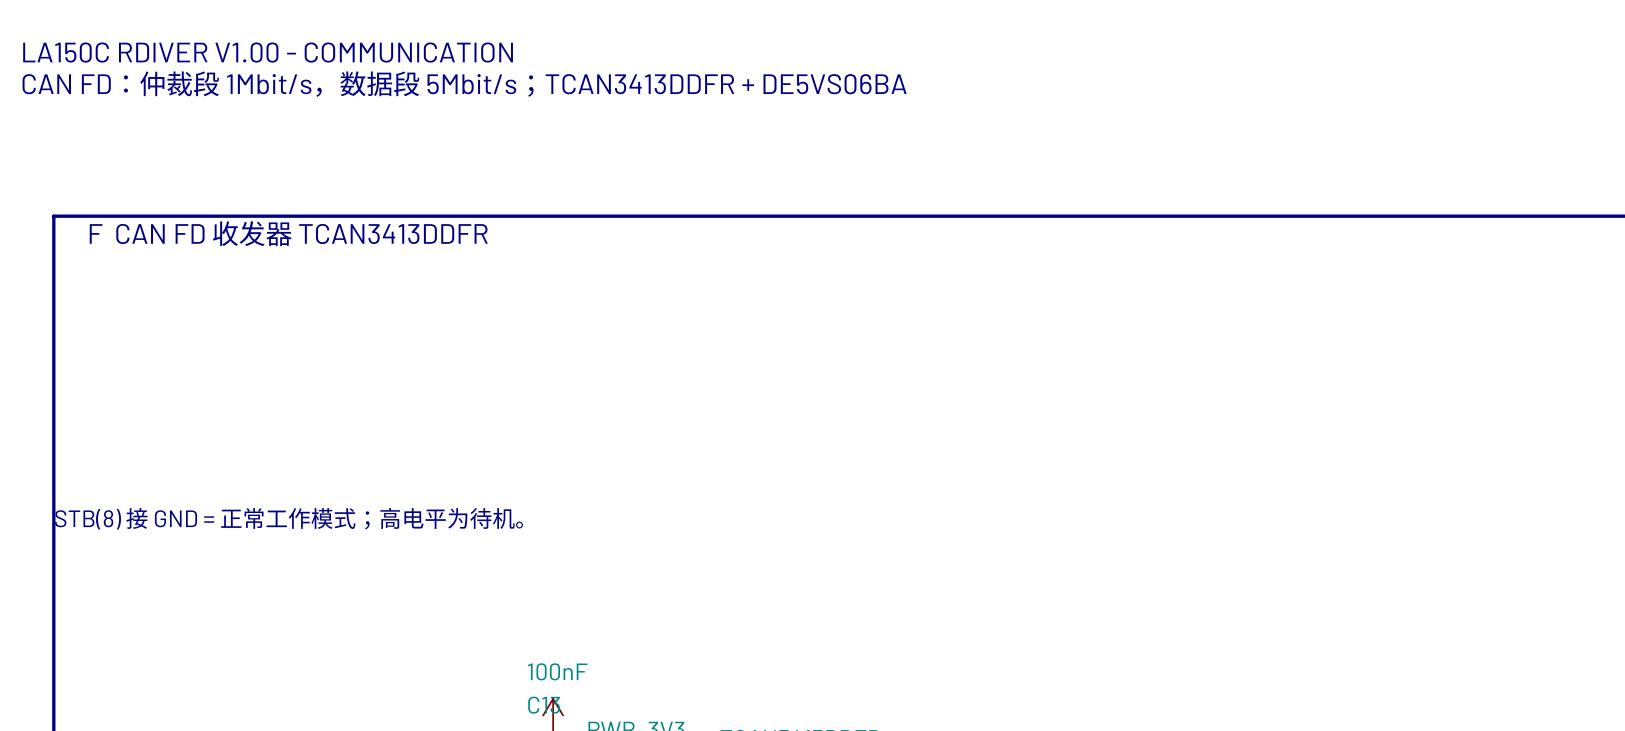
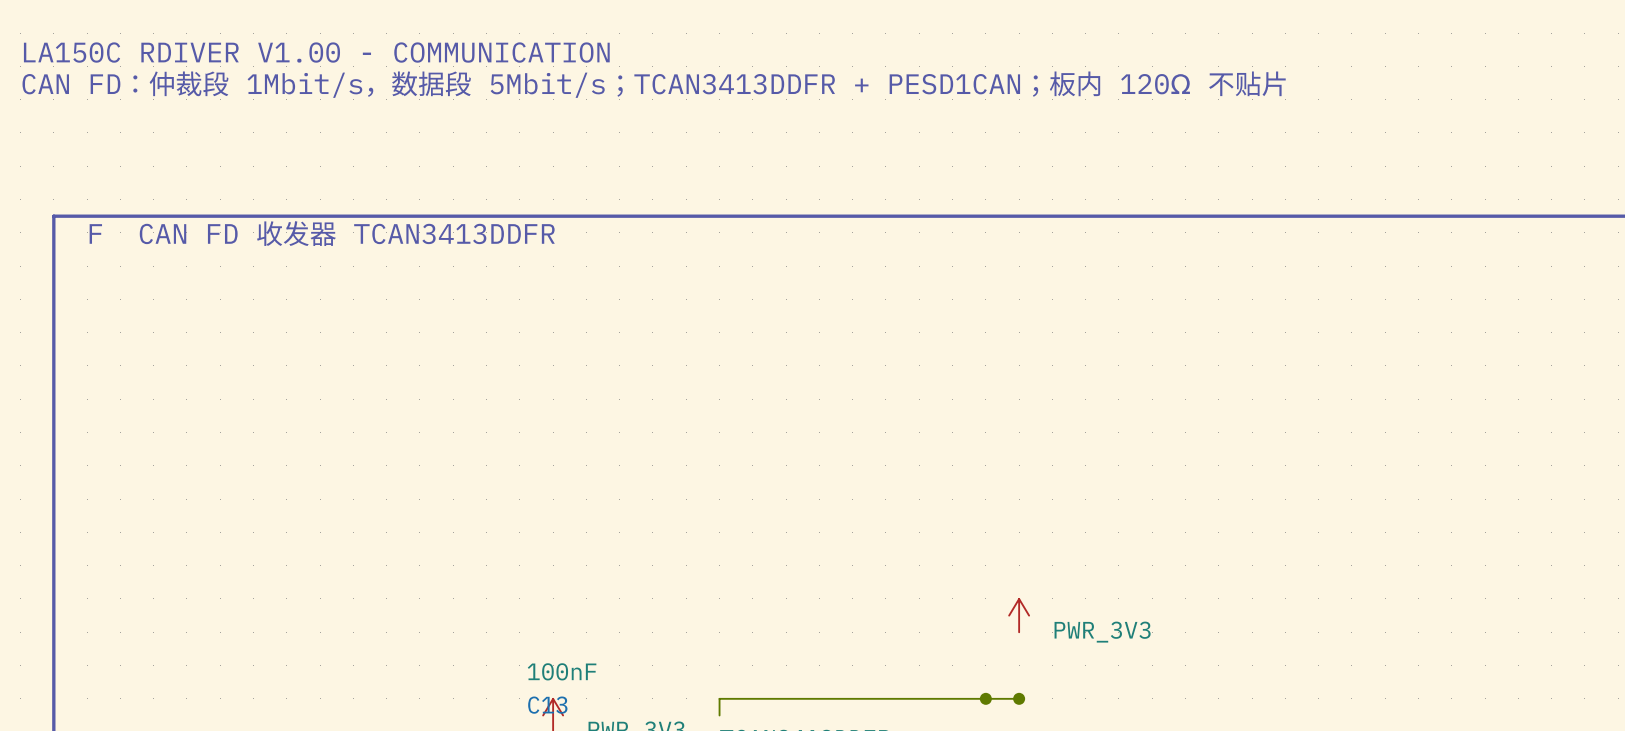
text: CAN FD：仲裁段 1Mbit/s，数据段 5Mbit/s；TCAN3413DDFR + DE5VS06BA (464, 84) -> CAN FD：仲裁段 1Mbit/s，数据段 5Mbit/s；TCAN3413DDFR + PESD1CAN；板内 120Ω 不贴片 (654, 84)
text: STB(8) 接 GND = 正常工作模式；高电平为待机。 (289, 518) -> none
power symbol: none -> PWR_3V3 (1019, 615)
junction: none -> (985, 698)
wire: none -> (1019, 698) (719, 698) (719, 715)
junction: none -> (1019, 698)

